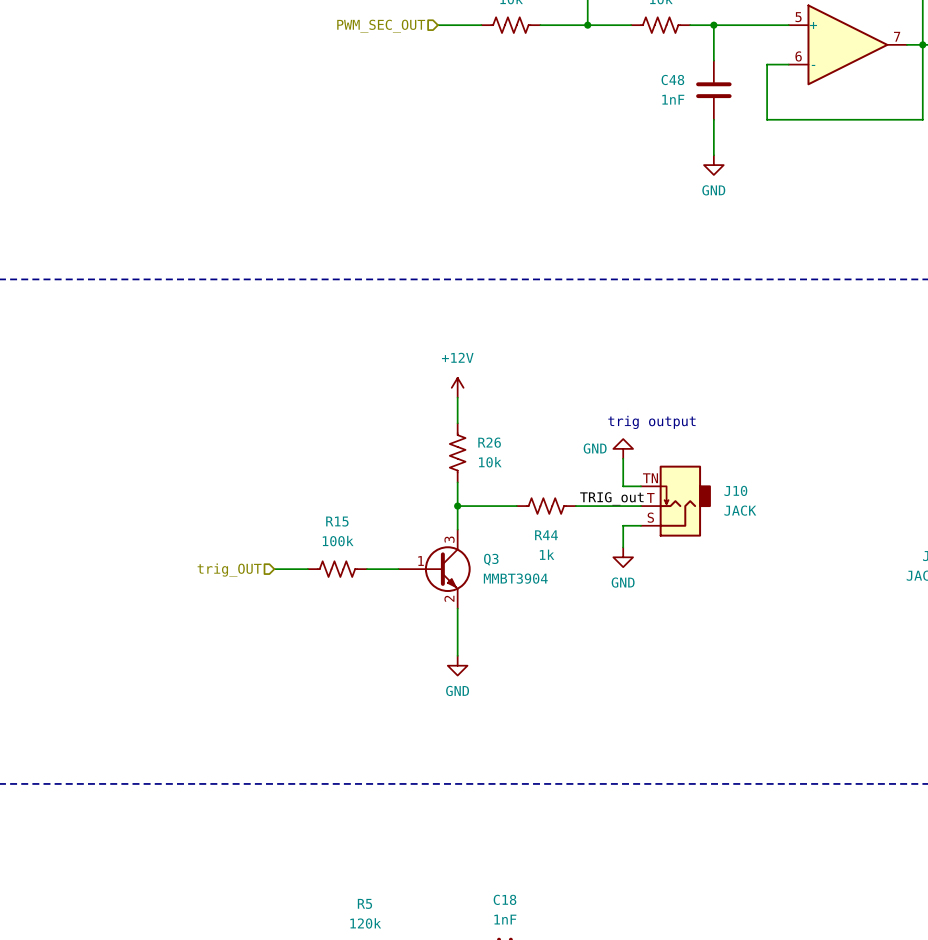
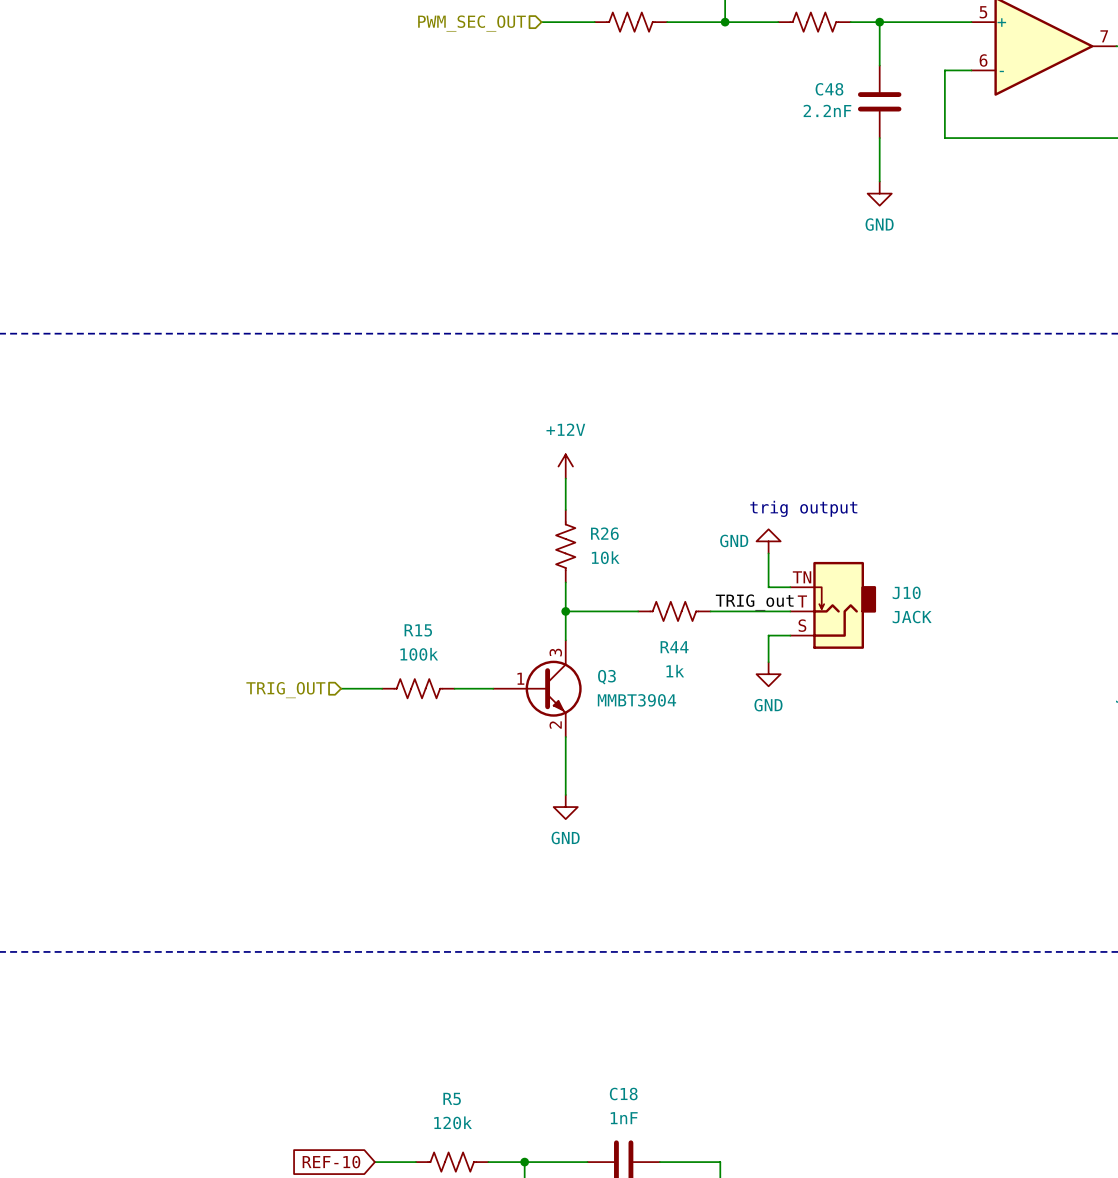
C48 value: 1nF (673, 99) -> 2.2nF (827, 110)
hierarchical label: trig_OUT (229, 570) -> TRIG_OUT (285, 690)

